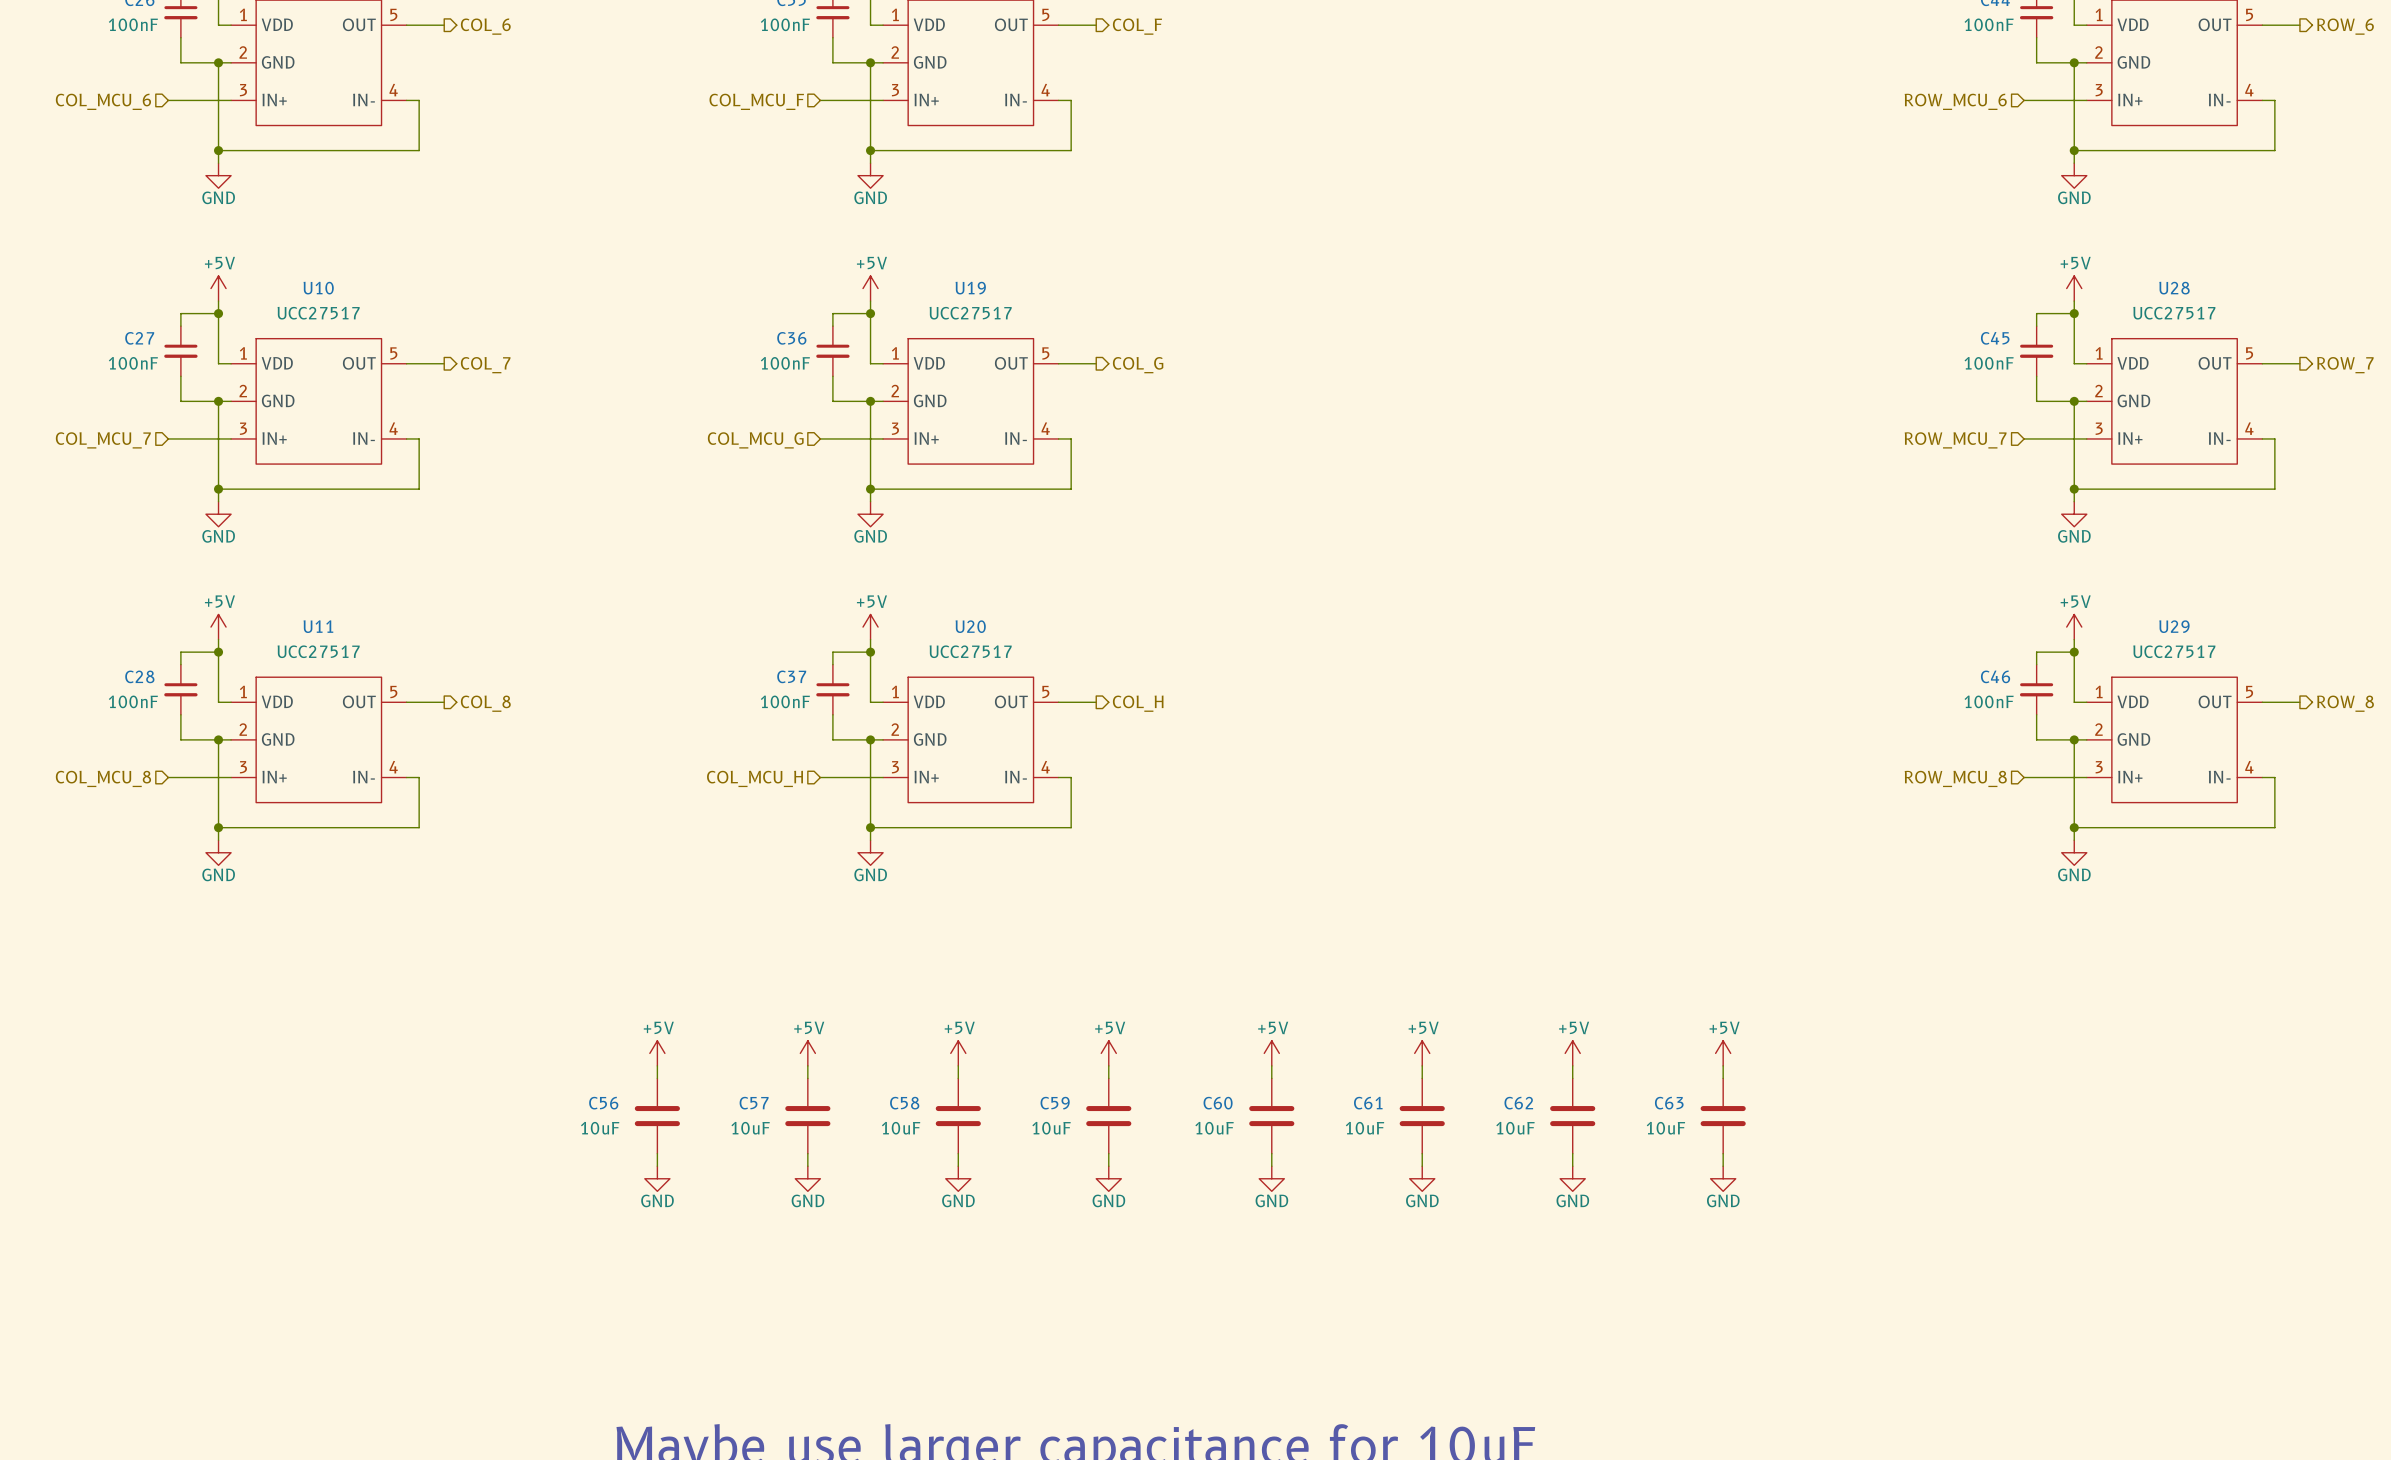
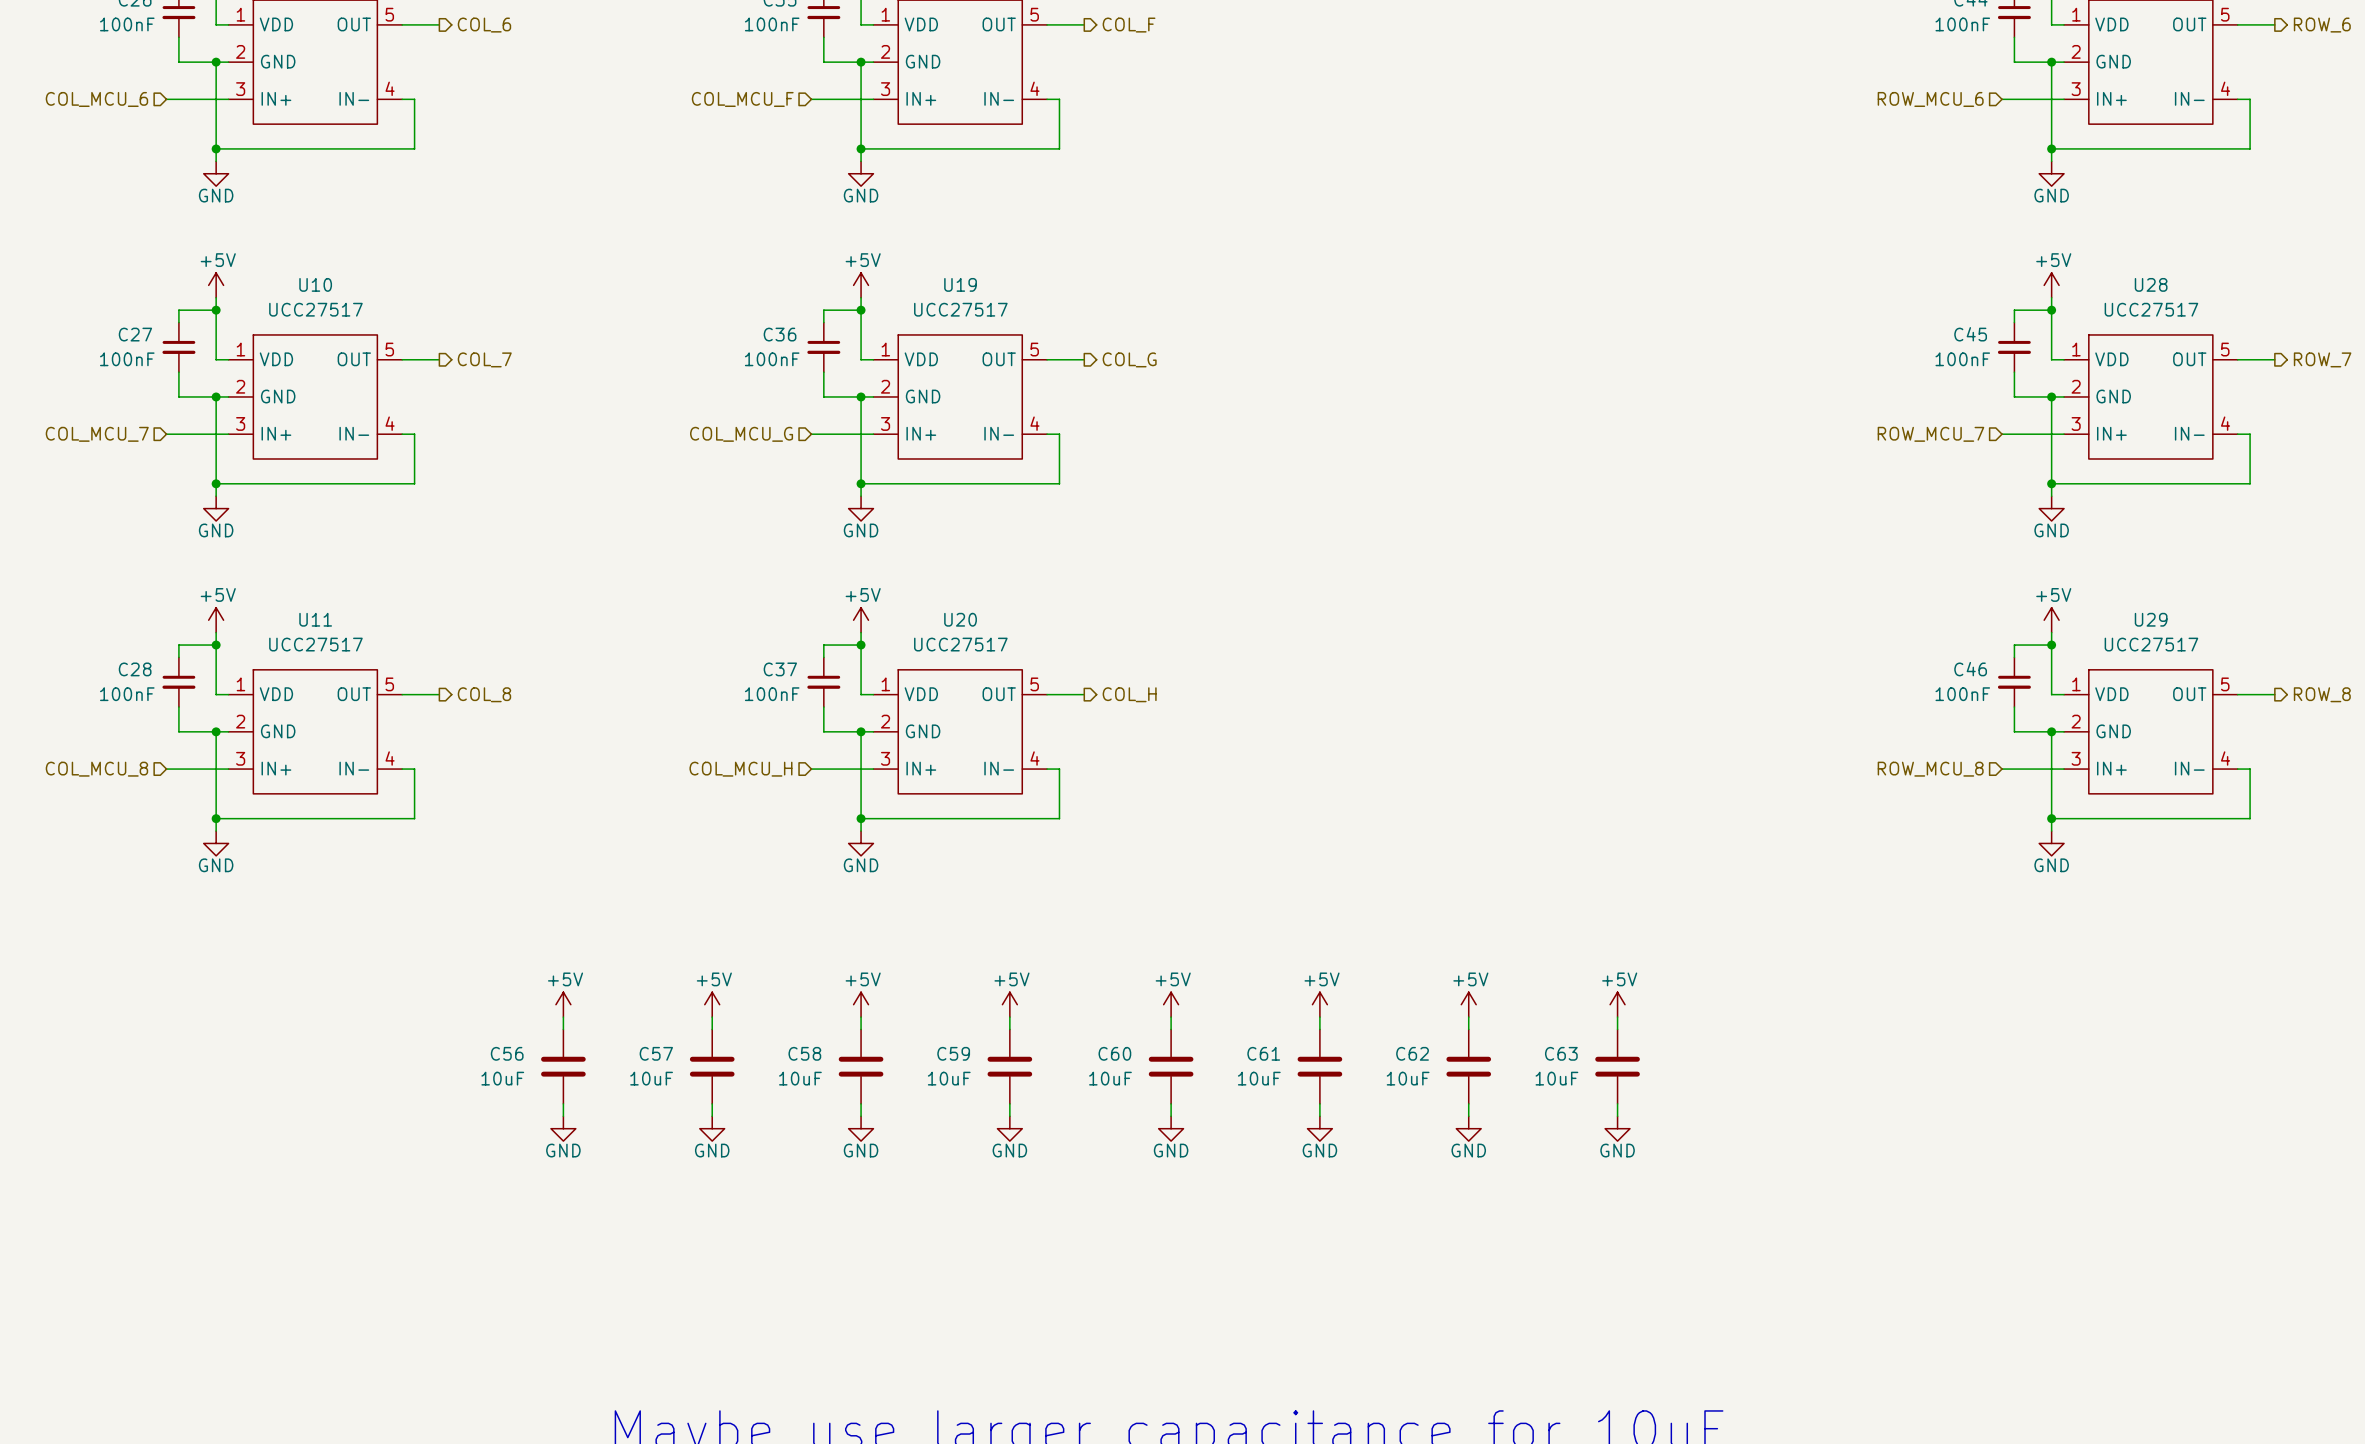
power symbol: none -> +5V (563, 1004)
power symbol: none -> +5V (712, 1004)
power symbol: none -> +5V (861, 1004)
power symbol: none -> +5V (1009, 1004)
power symbol: none -> +5V (1171, 1004)
power symbol: none -> +5V (1319, 1004)
power symbol: none -> +5V (1468, 1004)
power symbol: none -> +5V (1617, 1004)
power symbol: +5V (657, 1053) -> none
power symbol: +5V (807, 1053) -> none
power symbol: +5V (958, 1053) -> none
power symbol: +5V (1108, 1053) -> none
power symbol: +5V (1271, 1053) -> none
power symbol: +5V (1422, 1053) -> none
power symbol: +5V (1572, 1053) -> none
power symbol: +5V (1723, 1053) -> none
wire: (657, 1065) (657, 1078) -> (563, 1017) (563, 1029)
wire: (807, 1065) (807, 1078) -> (712, 1017) (712, 1029)
wire: (958, 1065) (958, 1078) -> (861, 1017) (861, 1029)
wire: (1108, 1065) (1108, 1078) -> (1009, 1017) (1009, 1029)
wire: (1271, 1065) (1271, 1078) -> (1171, 1017) (1171, 1029)
wire: (1422, 1065) (1422, 1078) -> (1319, 1017) (1319, 1029)
wire: (1572, 1065) (1572, 1078) -> (1468, 1017) (1468, 1029)
wire: (1723, 1065) (1723, 1078) -> (1617, 1017) (1617, 1029)
C56 position: (657, 1116) -> (563, 1066)
C57 position: (807, 1116) -> (712, 1066)
C58 position: (958, 1116) -> (861, 1066)
C59 position: (1108, 1116) -> (1009, 1066)
C60 position: (1271, 1116) -> (1171, 1066)
C61 position: (1422, 1116) -> (1319, 1066)
C62 position: (1572, 1116) -> (1468, 1066)
C63 position: (1723, 1116) -> (1617, 1066)
power symbol: none -> GND (563, 1128)
power symbol: none -> GND (712, 1128)
power symbol: none -> GND (861, 1128)
power symbol: none -> GND (1009, 1128)
power symbol: none -> GND (1171, 1128)
power symbol: none -> GND (1319, 1128)
power symbol: none -> GND (1468, 1128)
power symbol: none -> GND (1617, 1128)
wire: (657, 1153) (657, 1166) -> (563, 1103) (563, 1116)
wire: (807, 1153) (807, 1166) -> (712, 1103) (712, 1116)
wire: (958, 1153) (958, 1166) -> (861, 1103) (861, 1116)
wire: (1108, 1153) (1108, 1166) -> (1009, 1103) (1009, 1116)
wire: (1271, 1153) (1271, 1166) -> (1171, 1103) (1171, 1116)
wire: (1422, 1153) (1422, 1166) -> (1319, 1103) (1319, 1116)
wire: (1572, 1153) (1572, 1166) -> (1468, 1103) (1468, 1116)
wire: (1723, 1153) (1723, 1166) -> (1617, 1103) (1617, 1116)
power symbol: GND (657, 1178) -> none
power symbol: GND (807, 1178) -> none
power symbol: GND (958, 1178) -> none
power symbol: GND (1108, 1178) -> none
power symbol: GND (1271, 1178) -> none
power symbol: GND (1422, 1178) -> none
power symbol: GND (1572, 1178) -> none
power symbol: GND (1723, 1178) -> none

